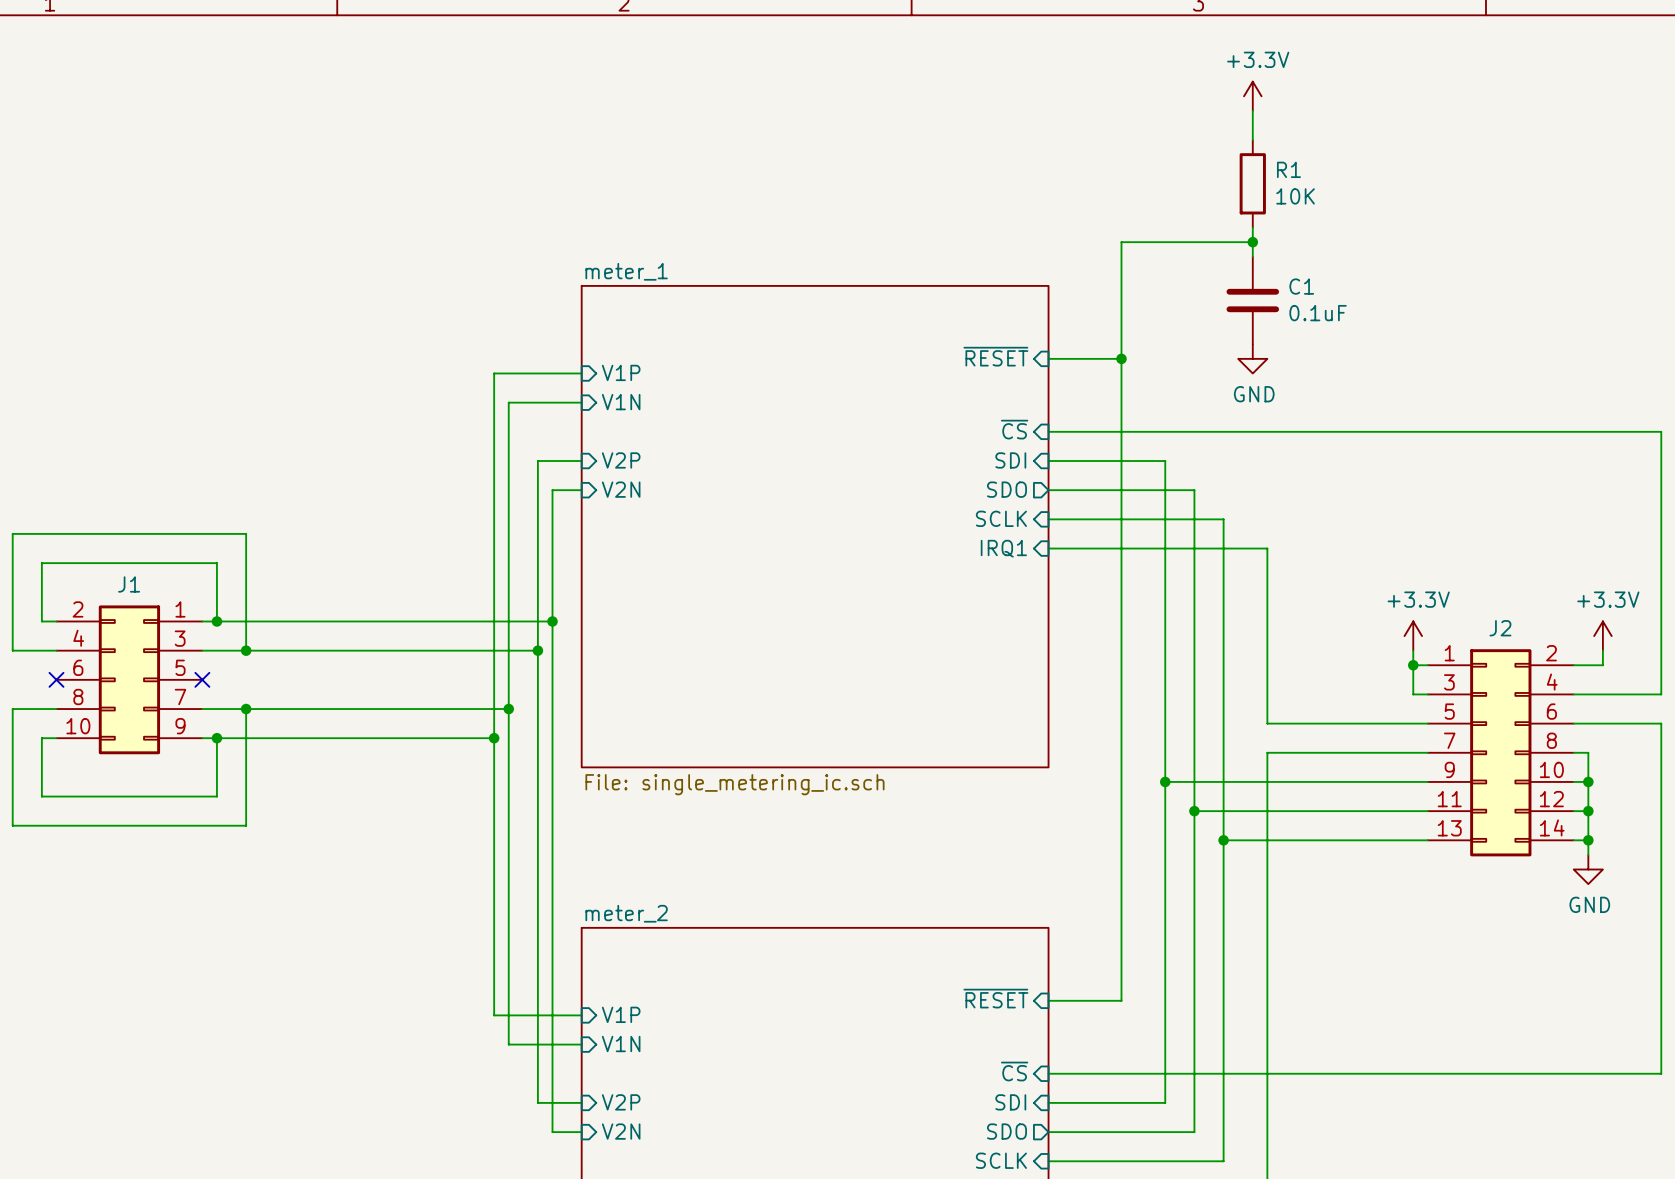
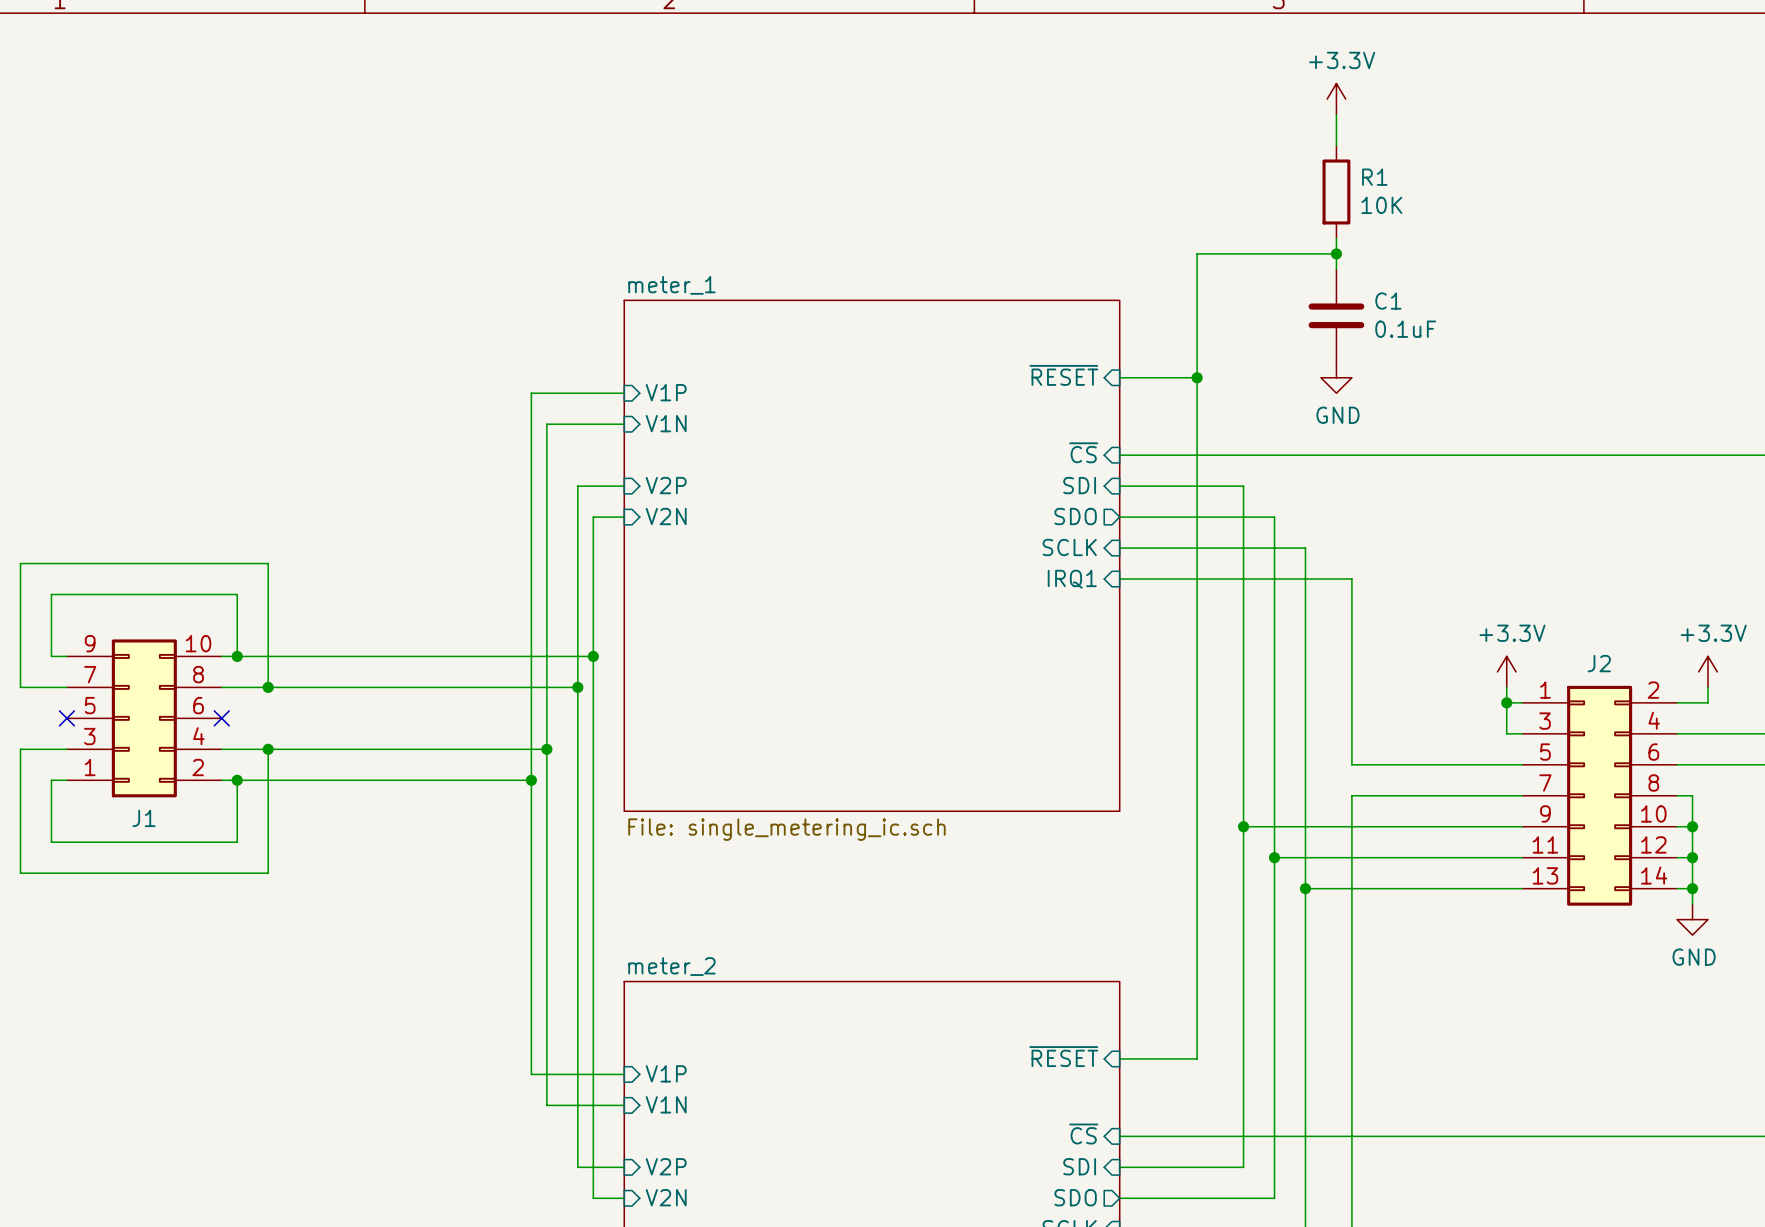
J1 rotation: 0° (129, 679) -> 180° (144, 718)

